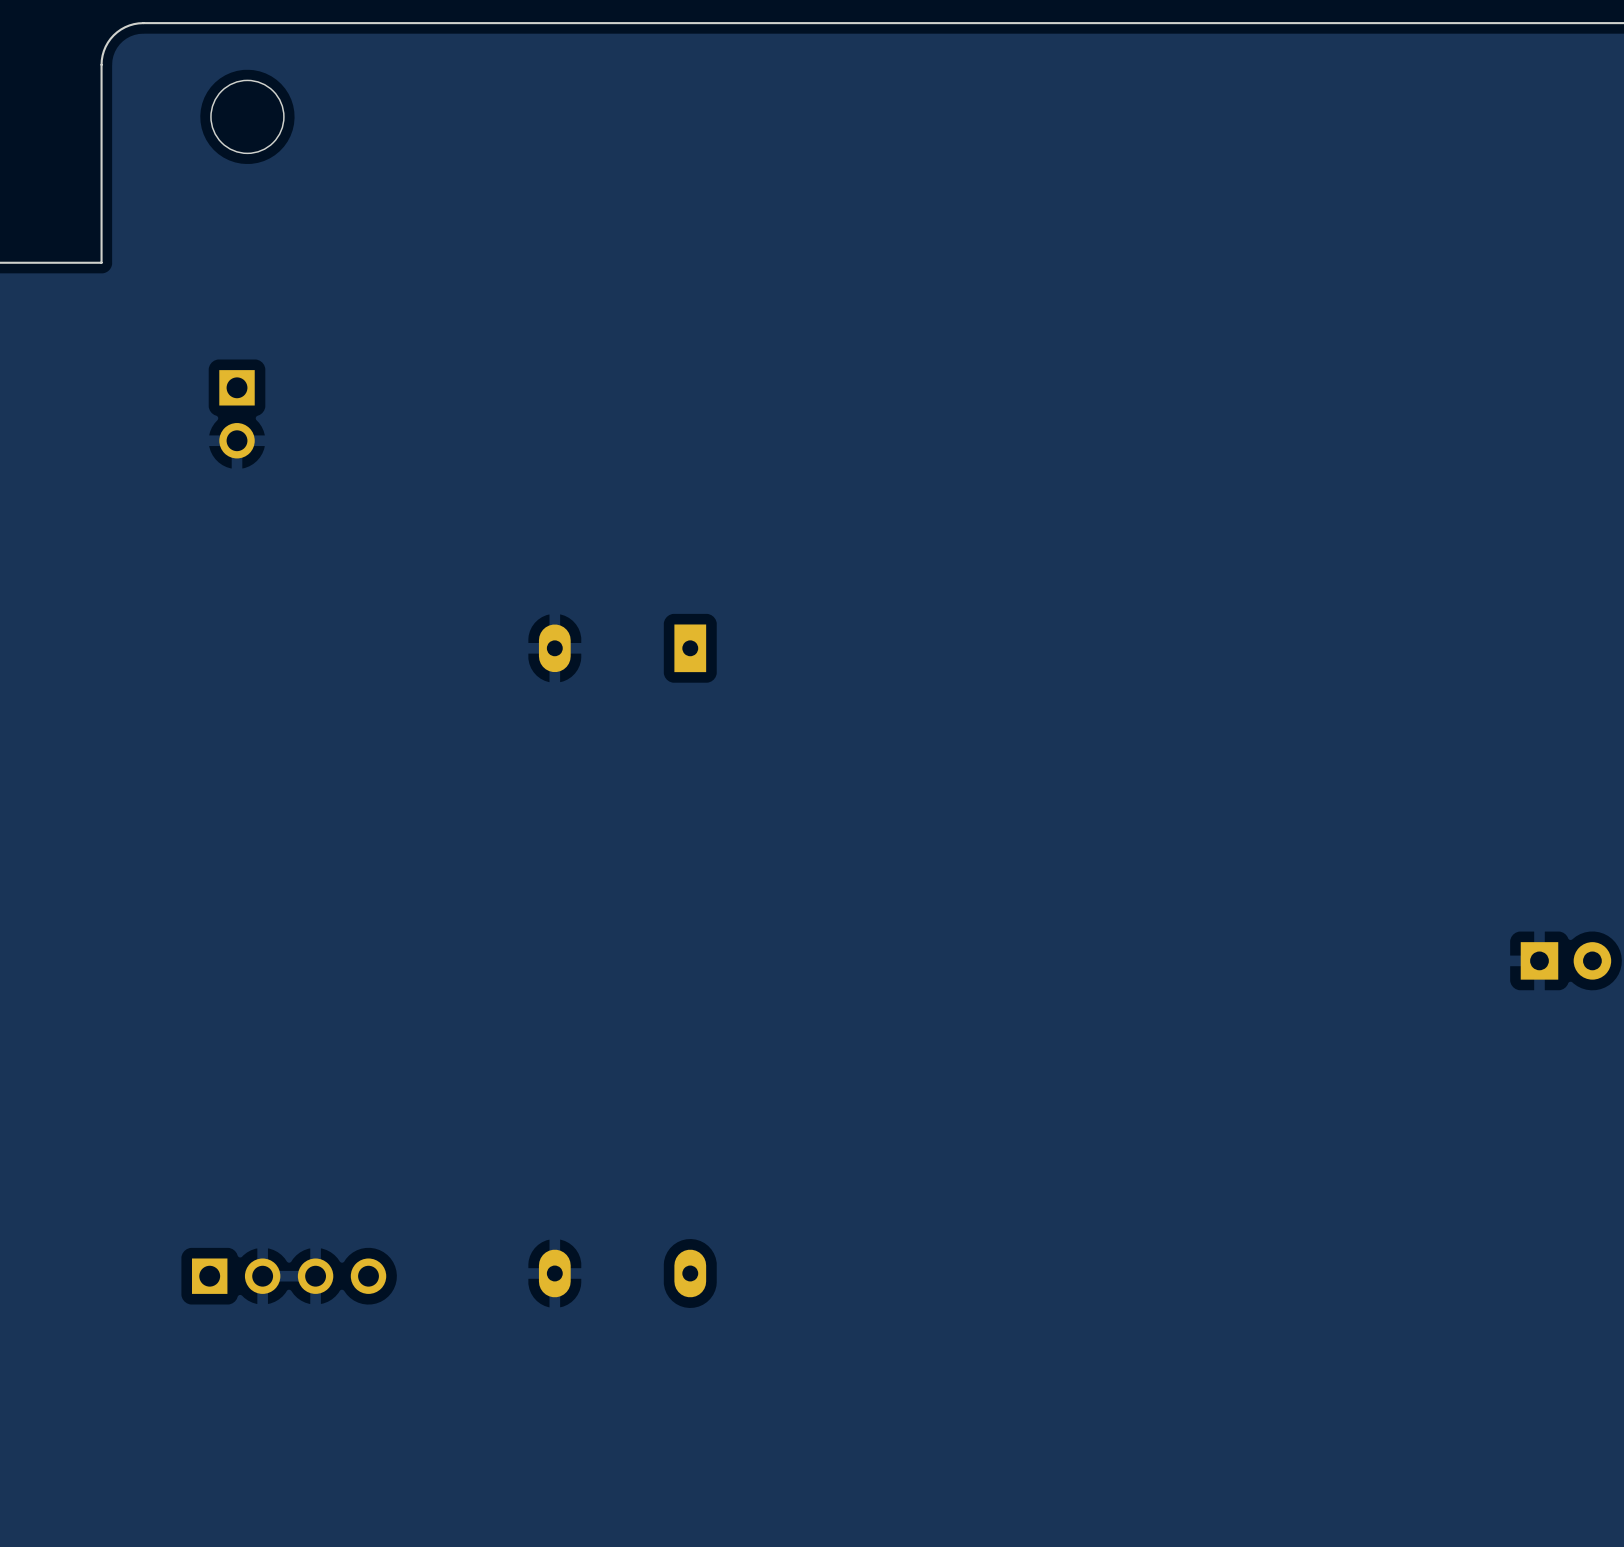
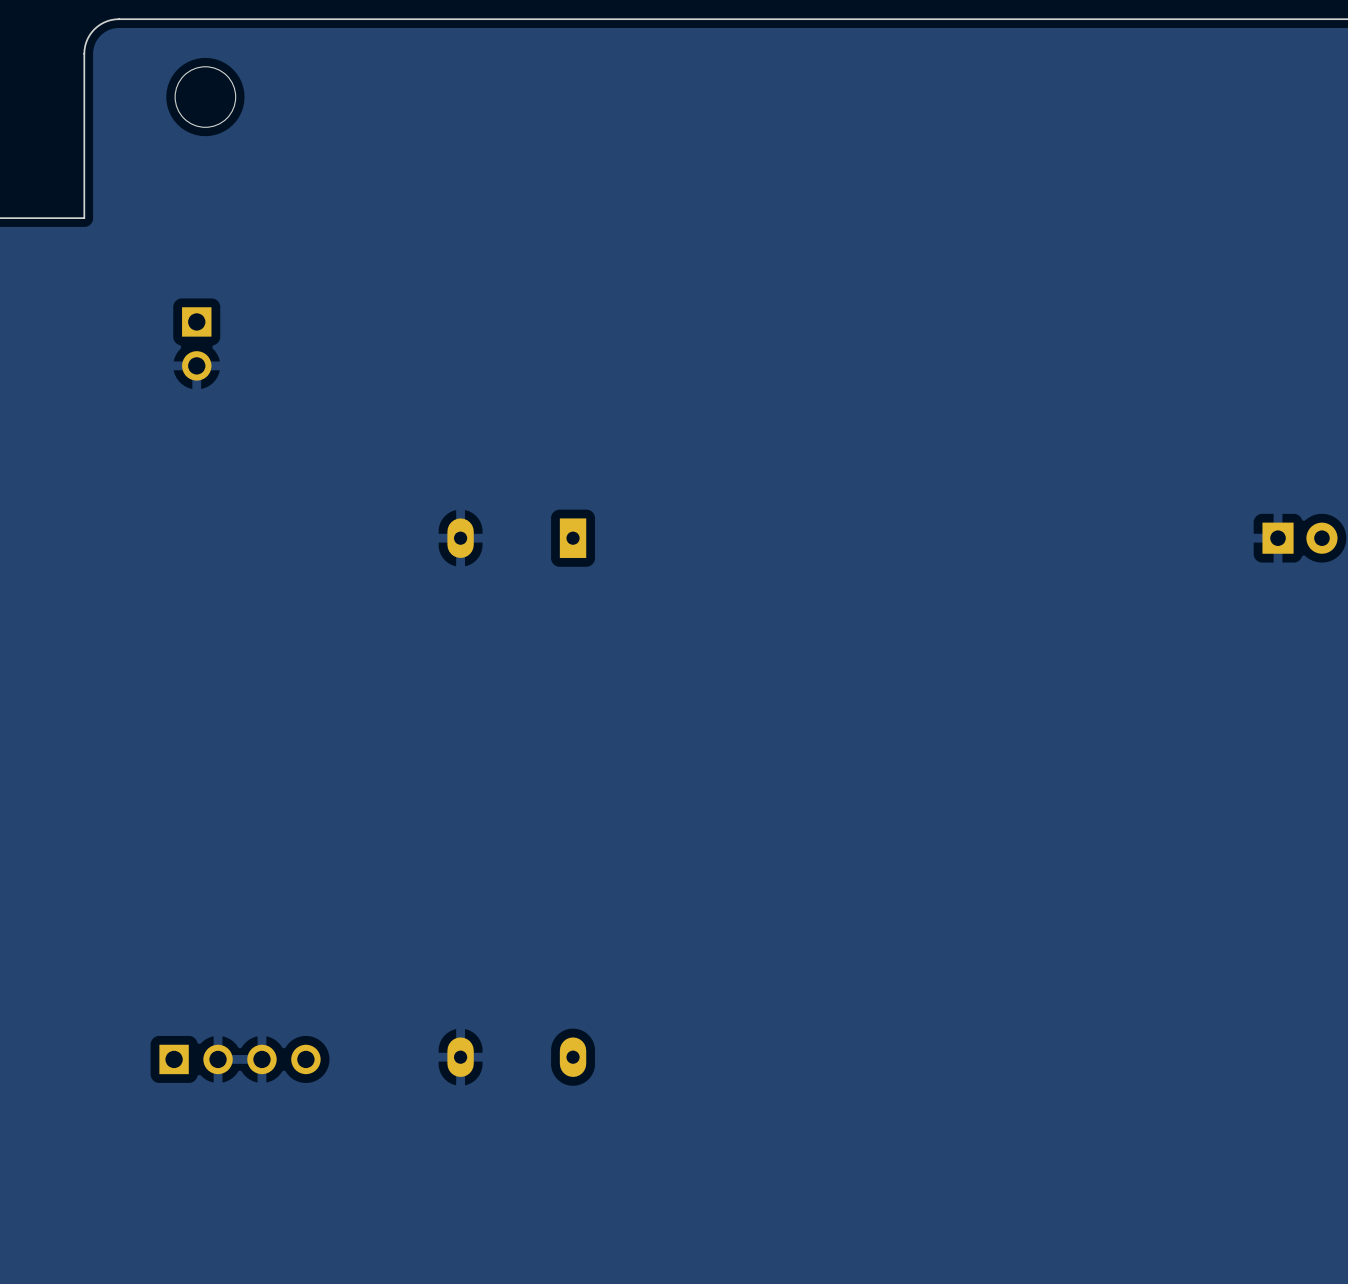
part position: (1565, 960) -> (1299, 538)

